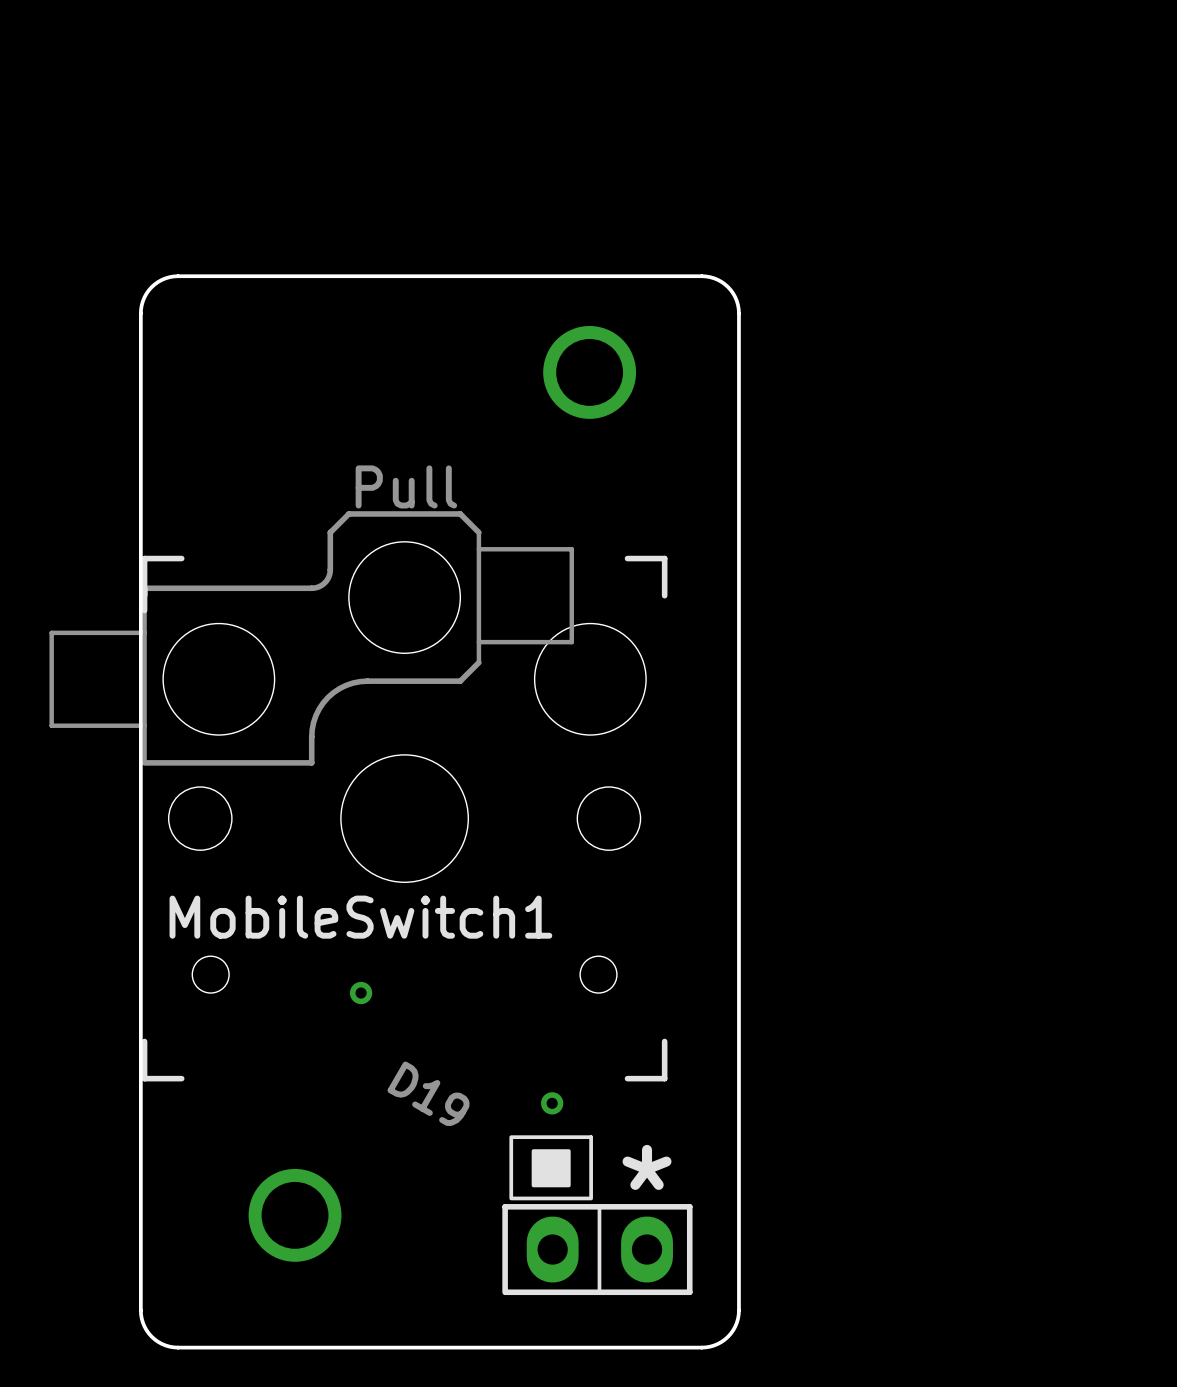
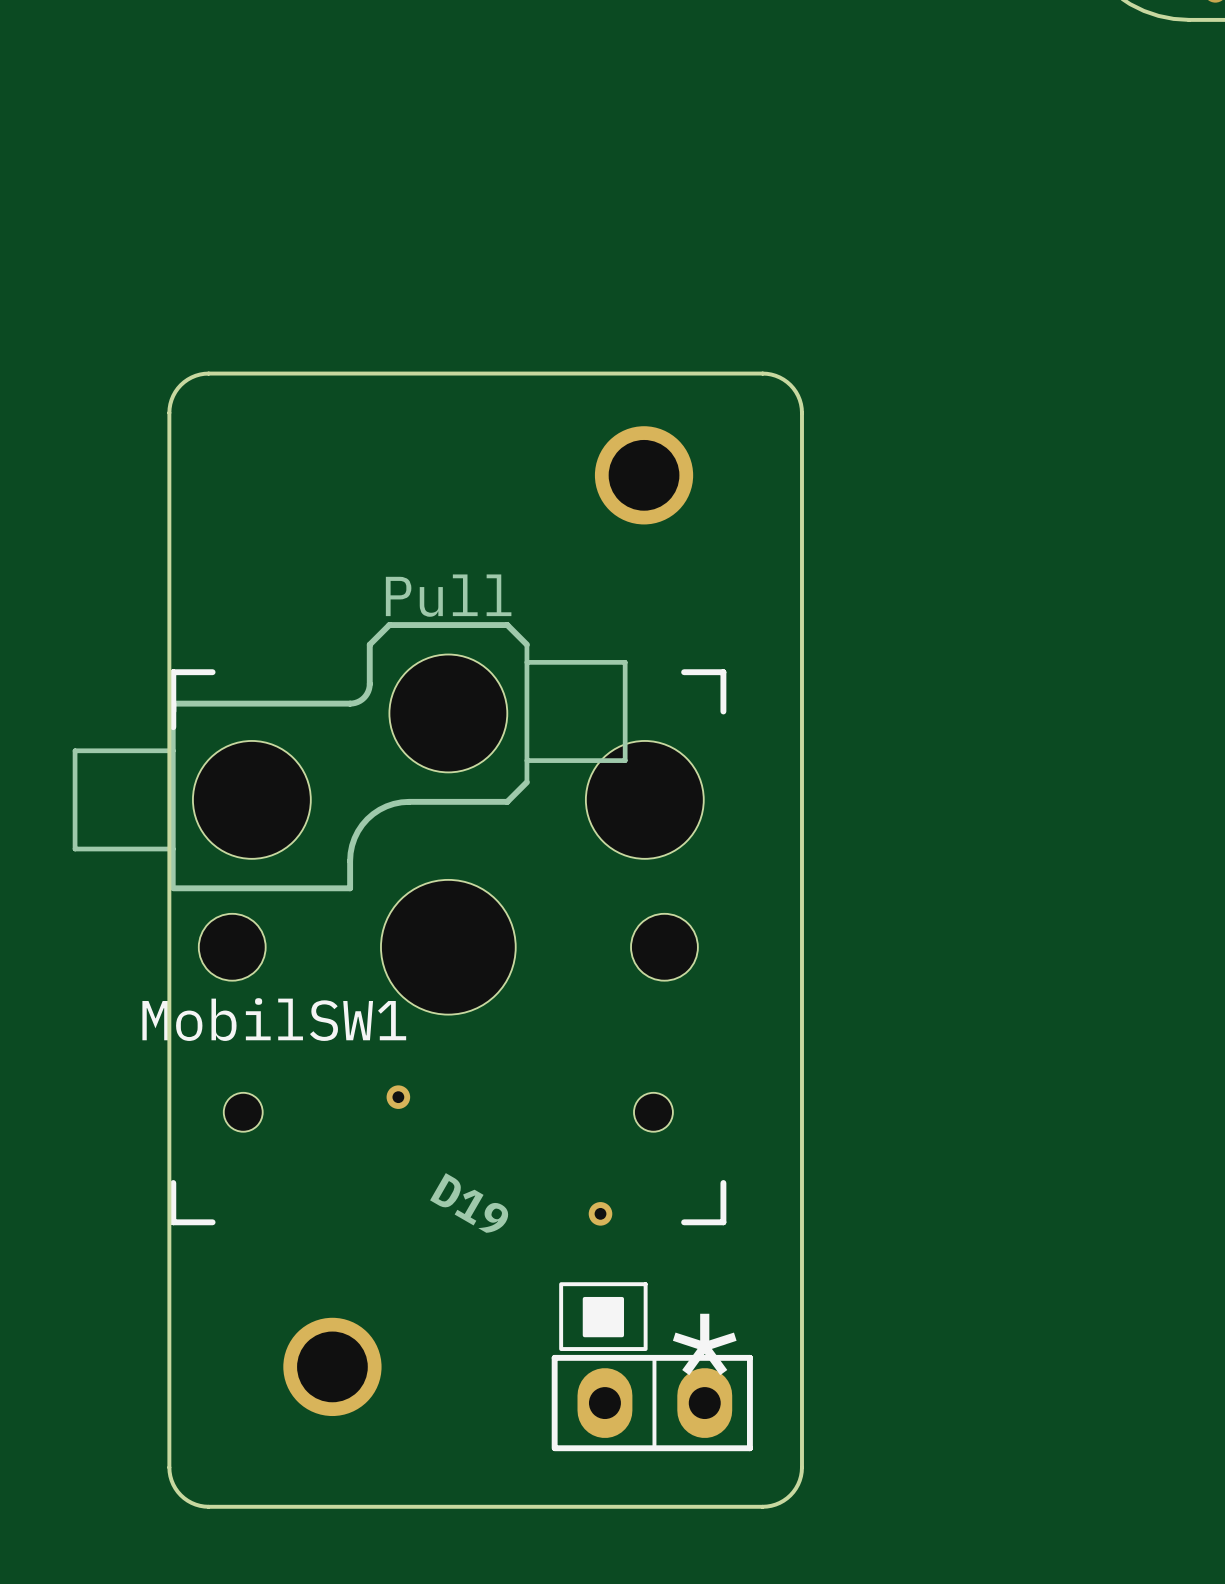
MobileSwitch1 name: MobileSwitch1 (360, 917) -> MobilSW1 (274, 1019)
D19 position: (456, 1048) -> (499, 1155)

